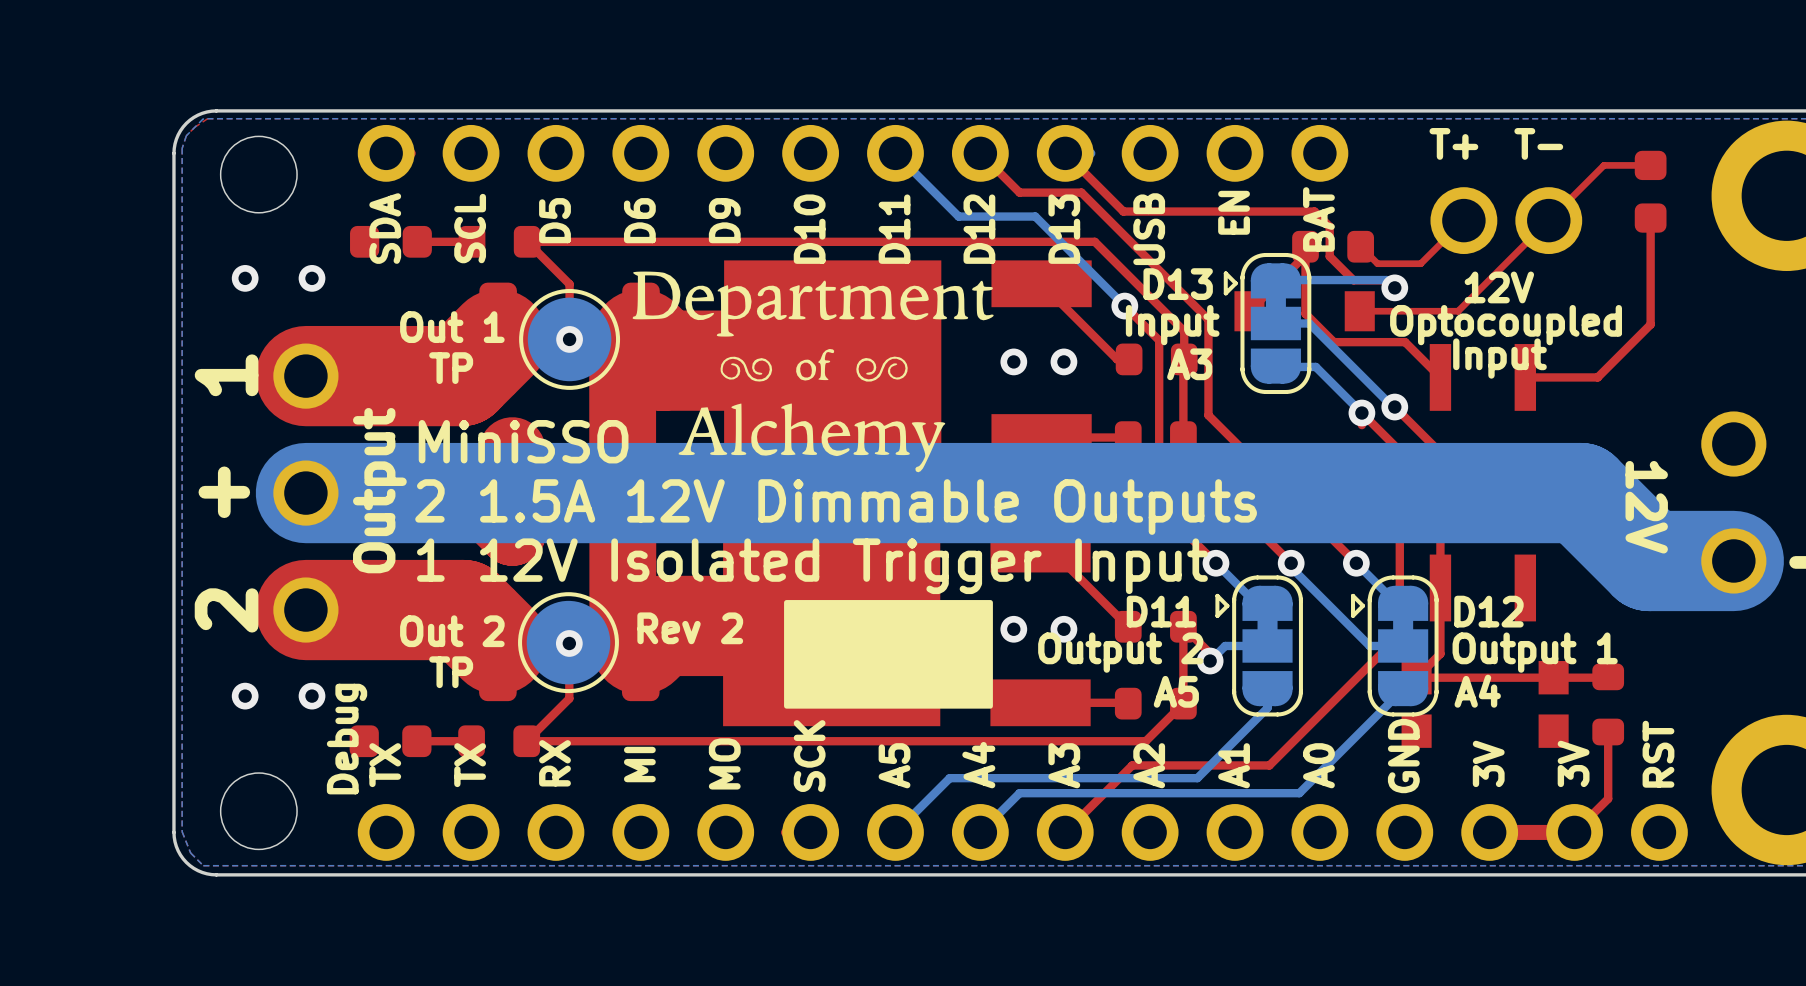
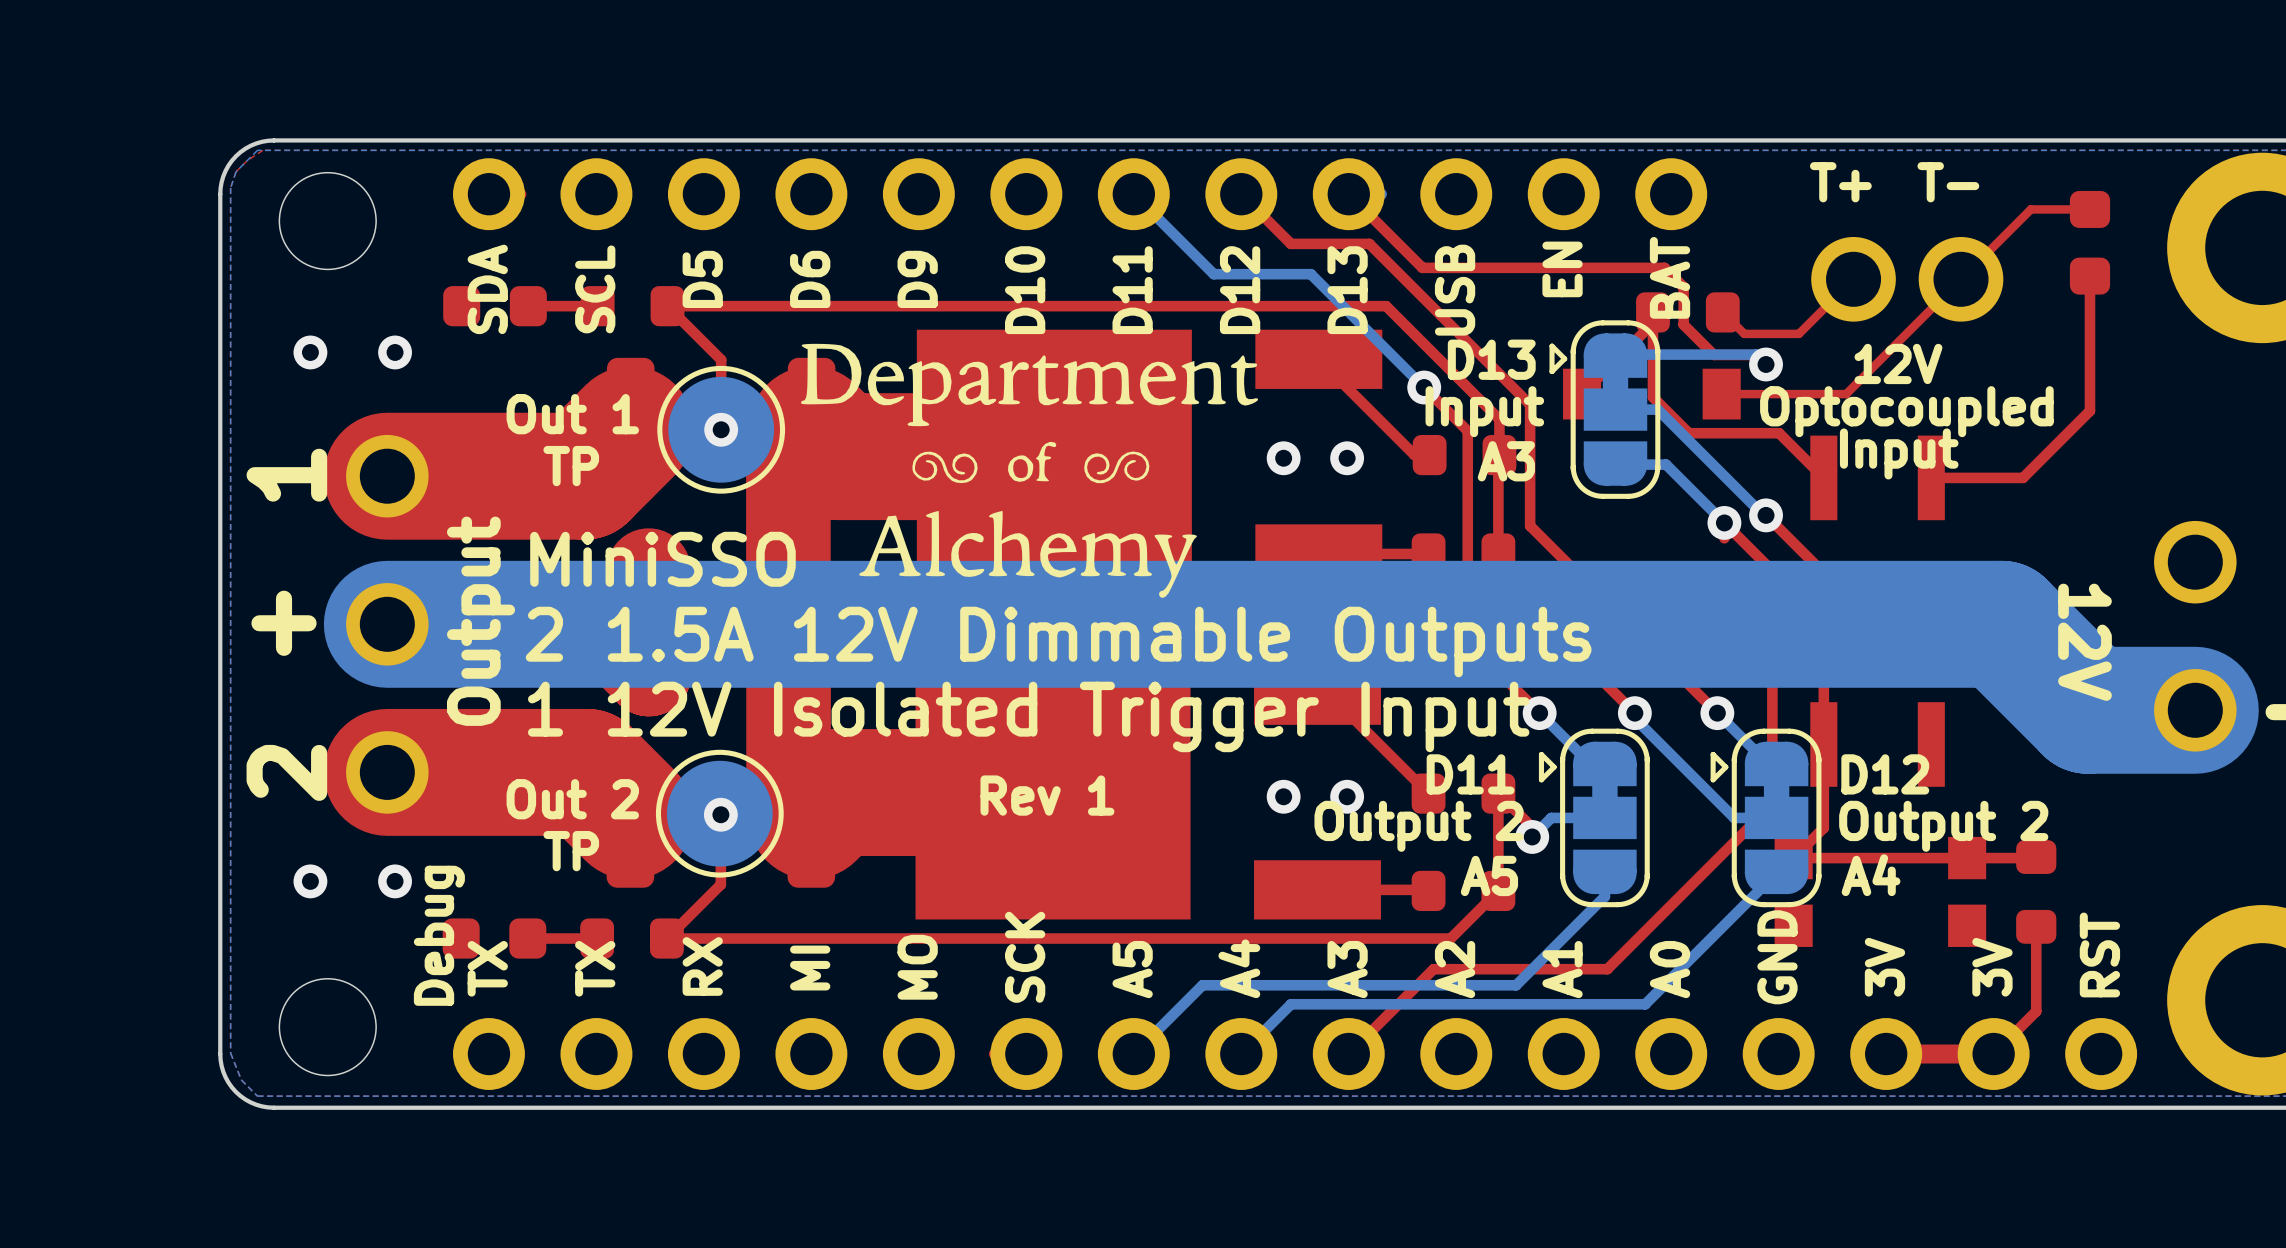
drawing: [784, 600, 993, 709] -> none
text: Rev 2 (690, 628) -> none
text: none -> Rev 1 (1047, 795)
text: Output 1 (1535, 652) -> Output 2 (1943, 826)

